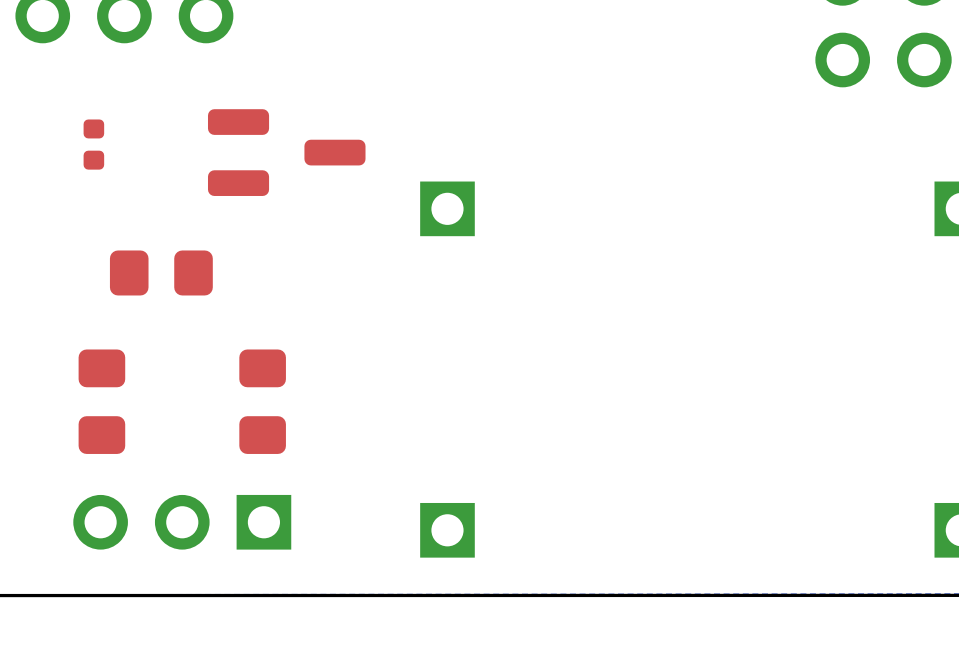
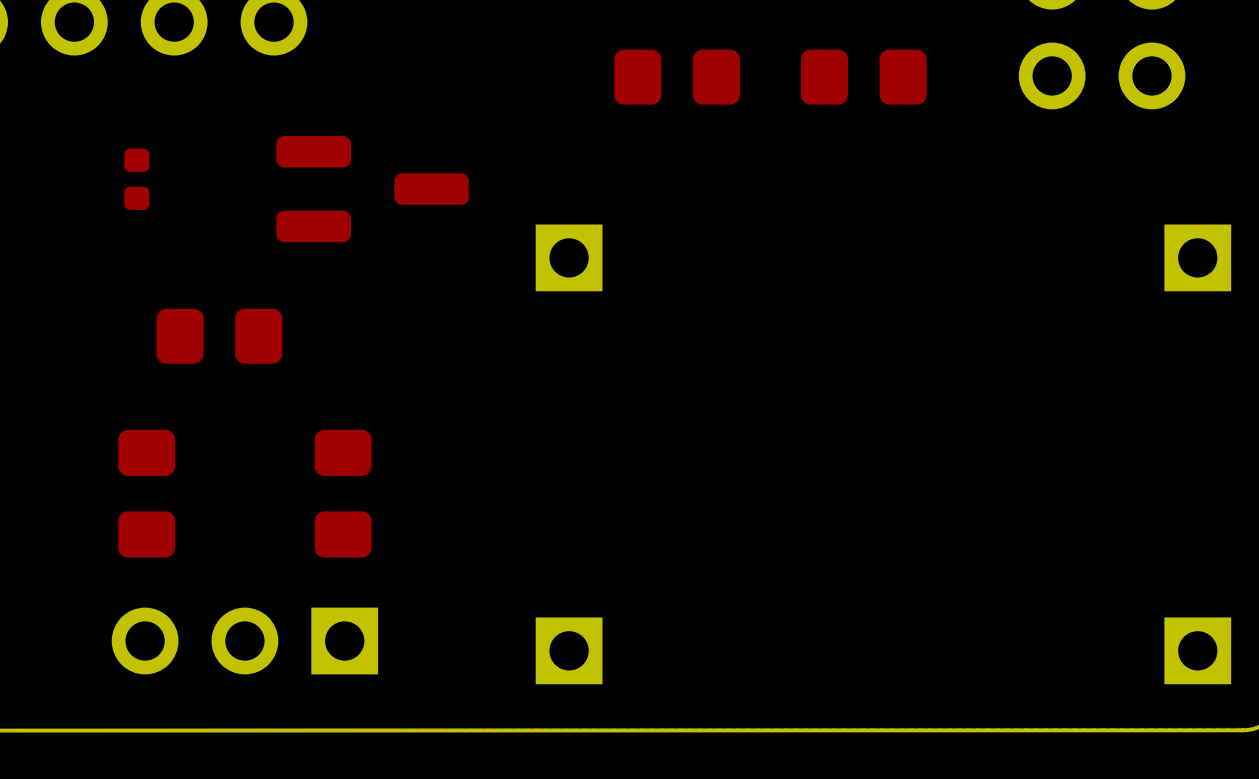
part: none -> (677, 77)
part: none -> (863, 77)

